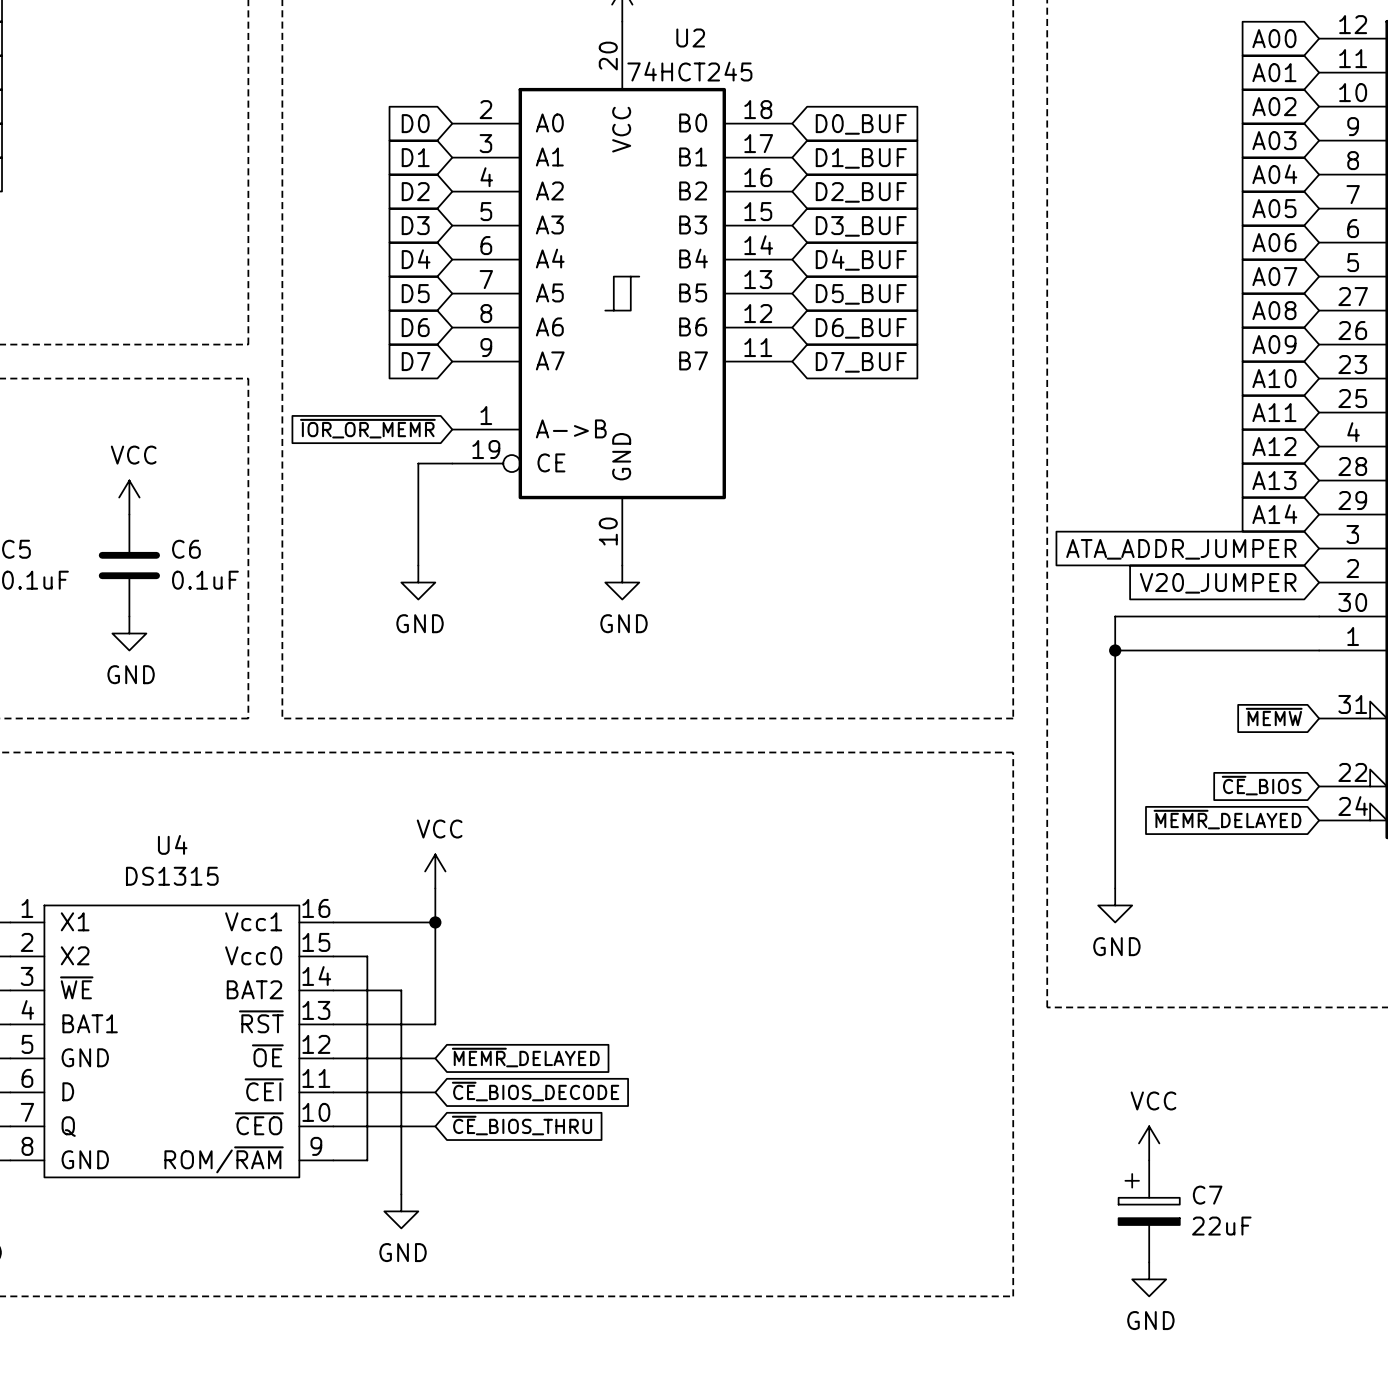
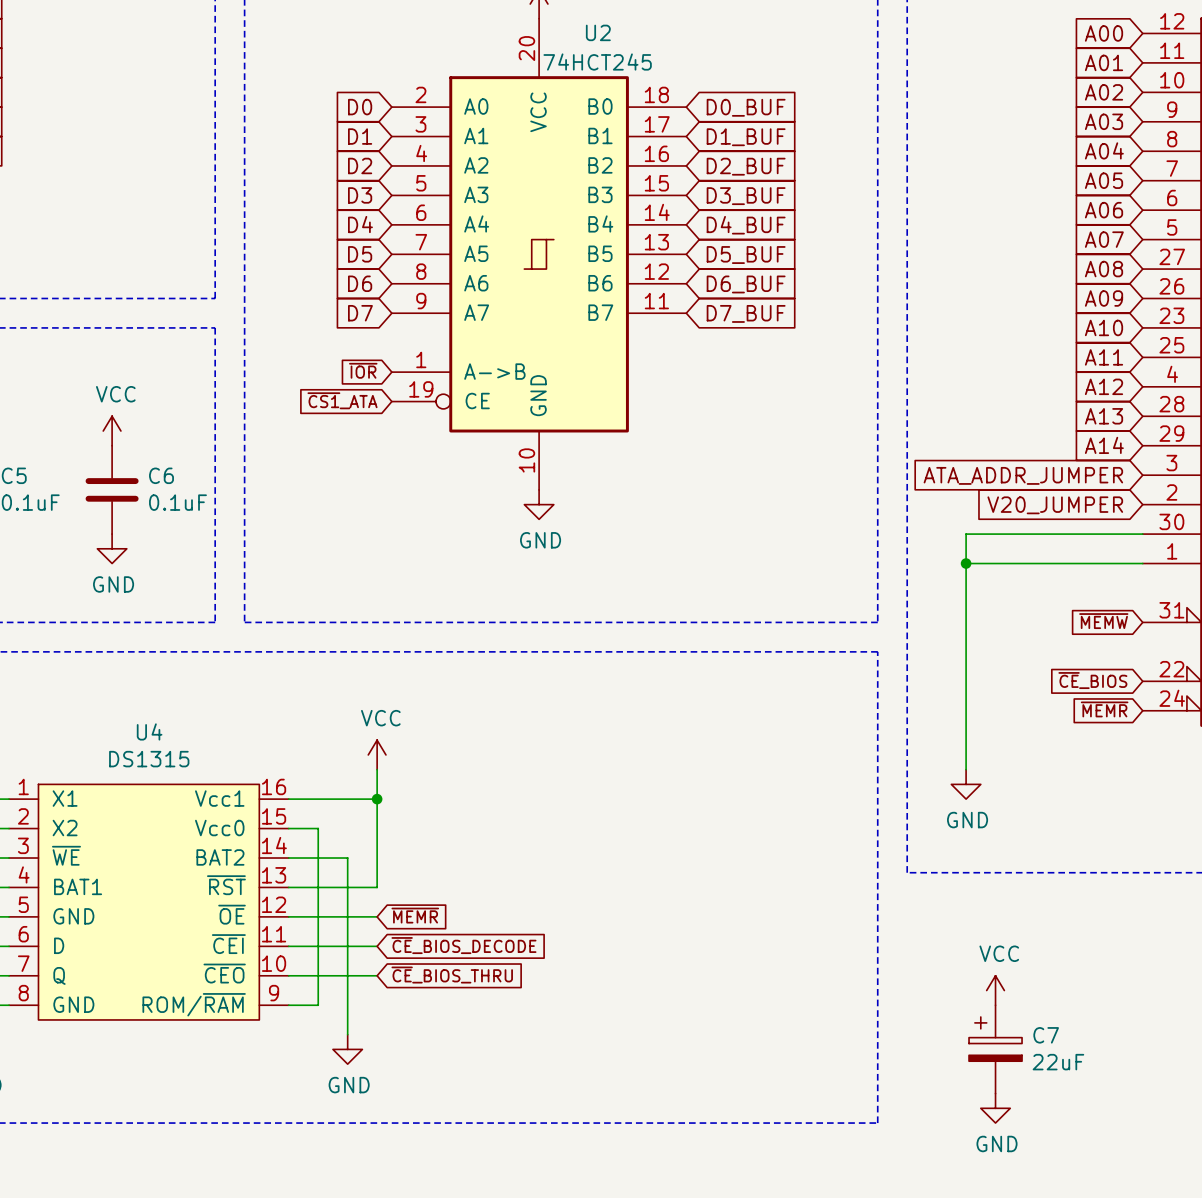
global label: ~{IOR_OR_MEMR} (367, 428) -> ~{IOR} (363, 370)
global label: none -> ~{CS1}_ATA (342, 400)
wire: (452, 463) (418, 463) (418, 565) -> none
power symbol: GND (418, 582) -> none
global label: ~{MEMR}_DELAYED (1227, 819) -> ~{MEMR} (1104, 709)
global label: ~{MEMR}_DELAYED (525, 1057) -> ~{MEMR} (415, 915)

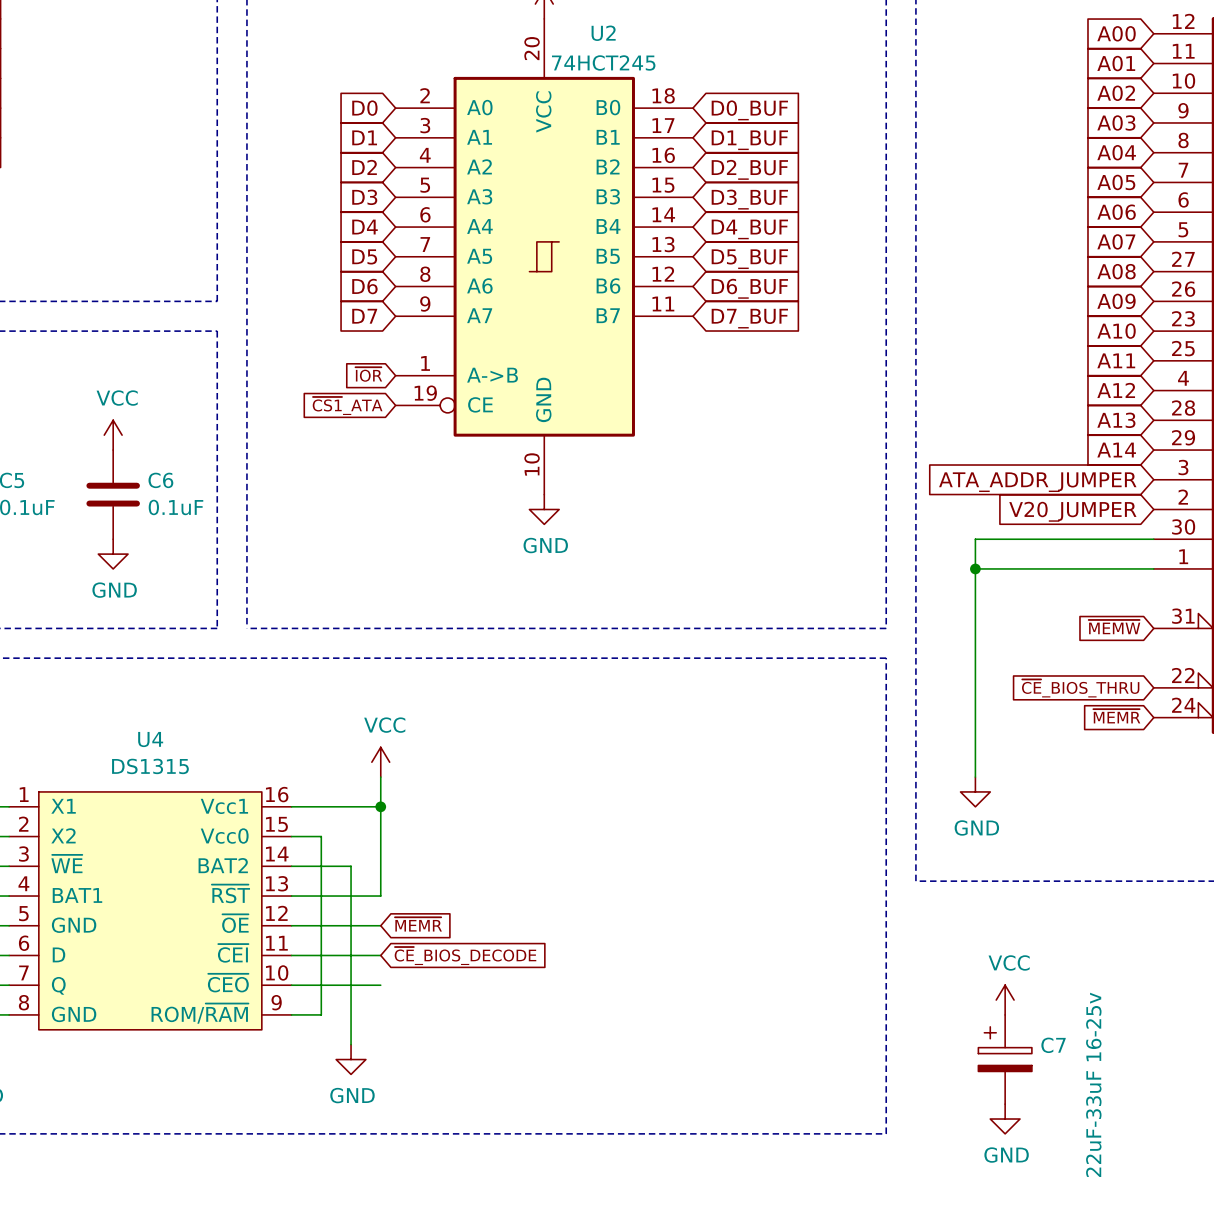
global label: ~{CE}_BIOS (1092, 680) -> ~{CE}_BIOS_THRU (1080, 688)
global label: ~{CE}_BIOS_THRU (452, 975) -> none
C7 value: 22uF (1058, 1062) -> 22uF-33uF 16-25v (1093, 1084)

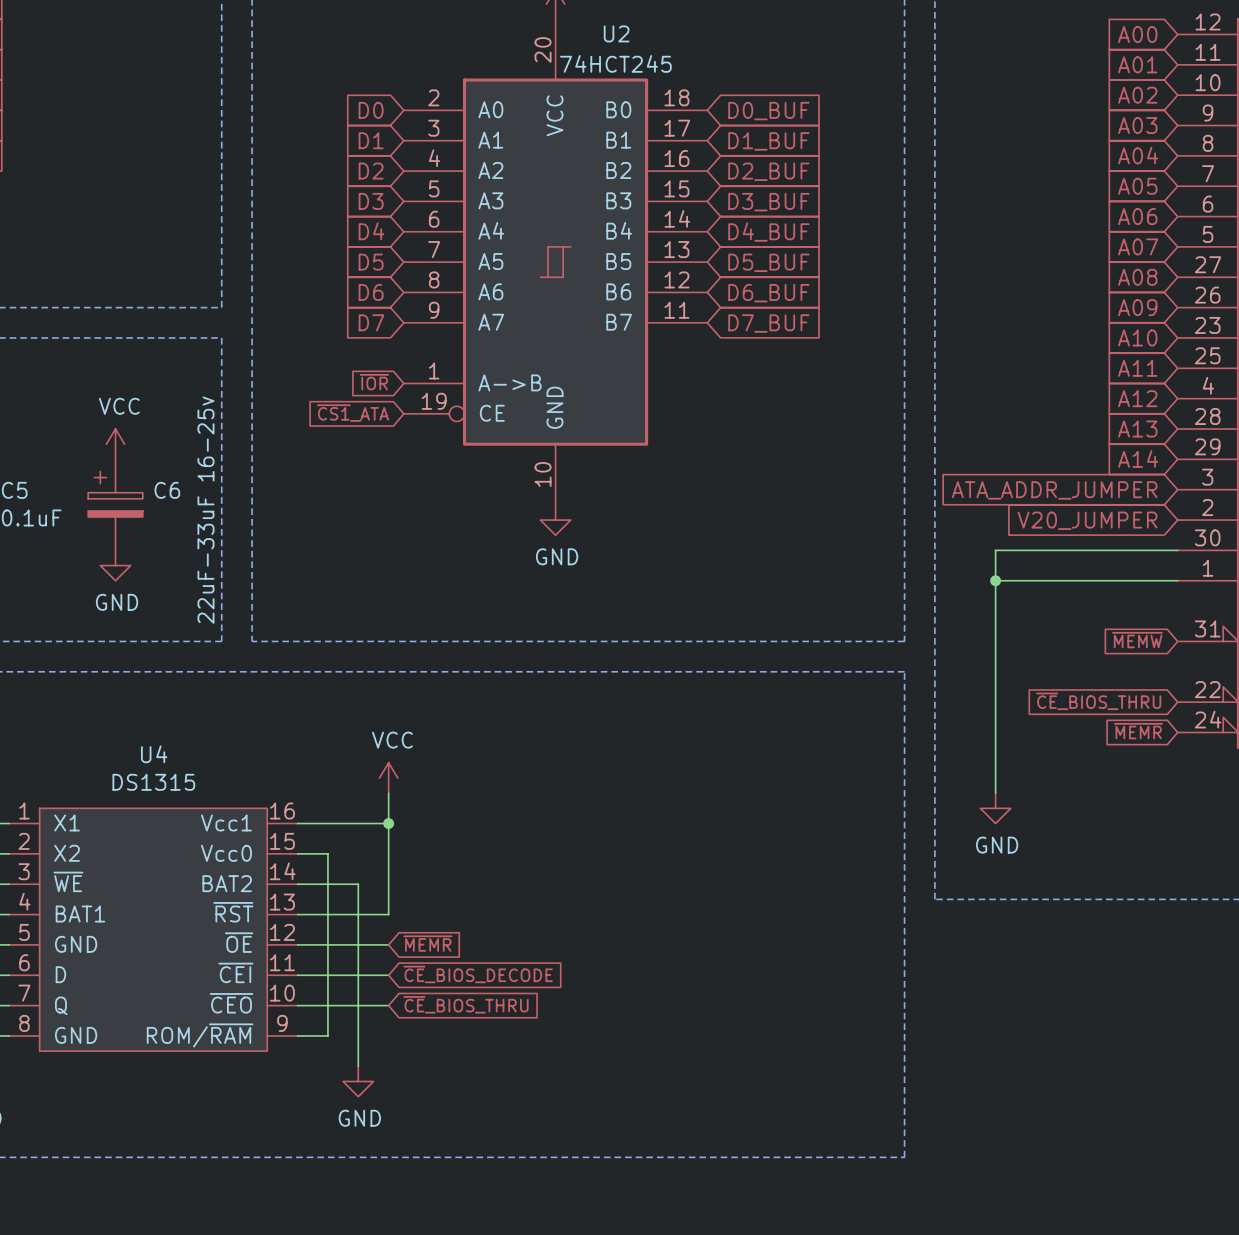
C6 symbol: [86, 450, 140, 540] -> [88, 459, 143, 551]
C6 value: 0.1uF (175, 507) -> 22uF-33uF 16-25v (205, 510)
global label: none -> ~{CE}_BIOS_THRU (466, 1004)
power symbol: VCC (1005, 1000) -> none
C7: 22uF-33uF 16-25v (1005, 1059) -> none
power symbol: GND (1005, 1119) -> none

